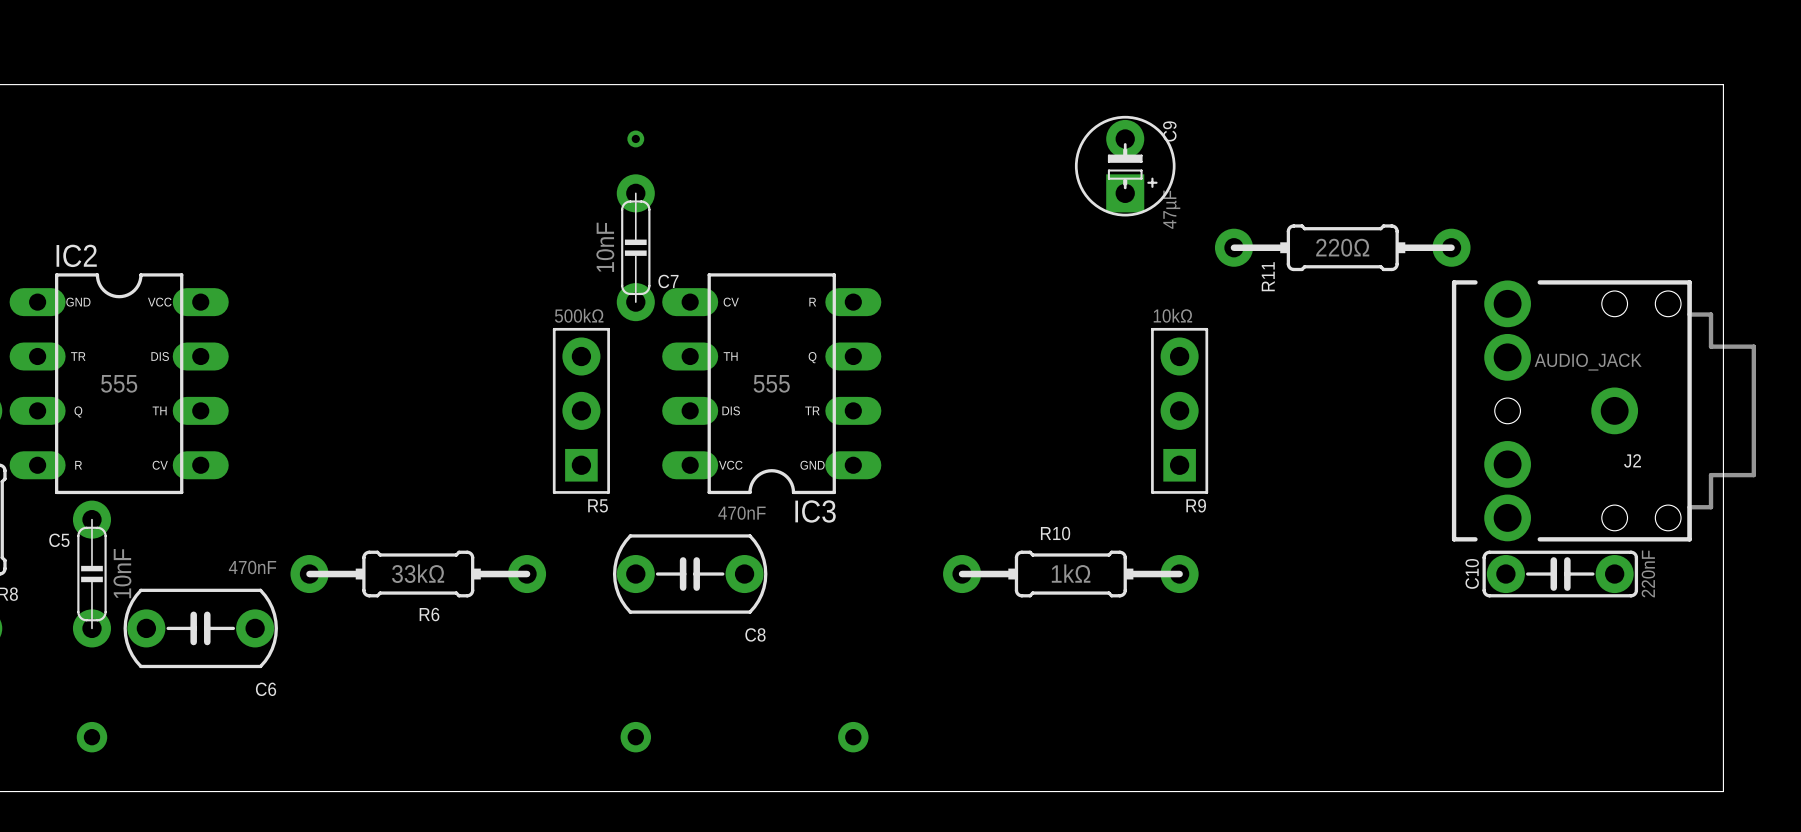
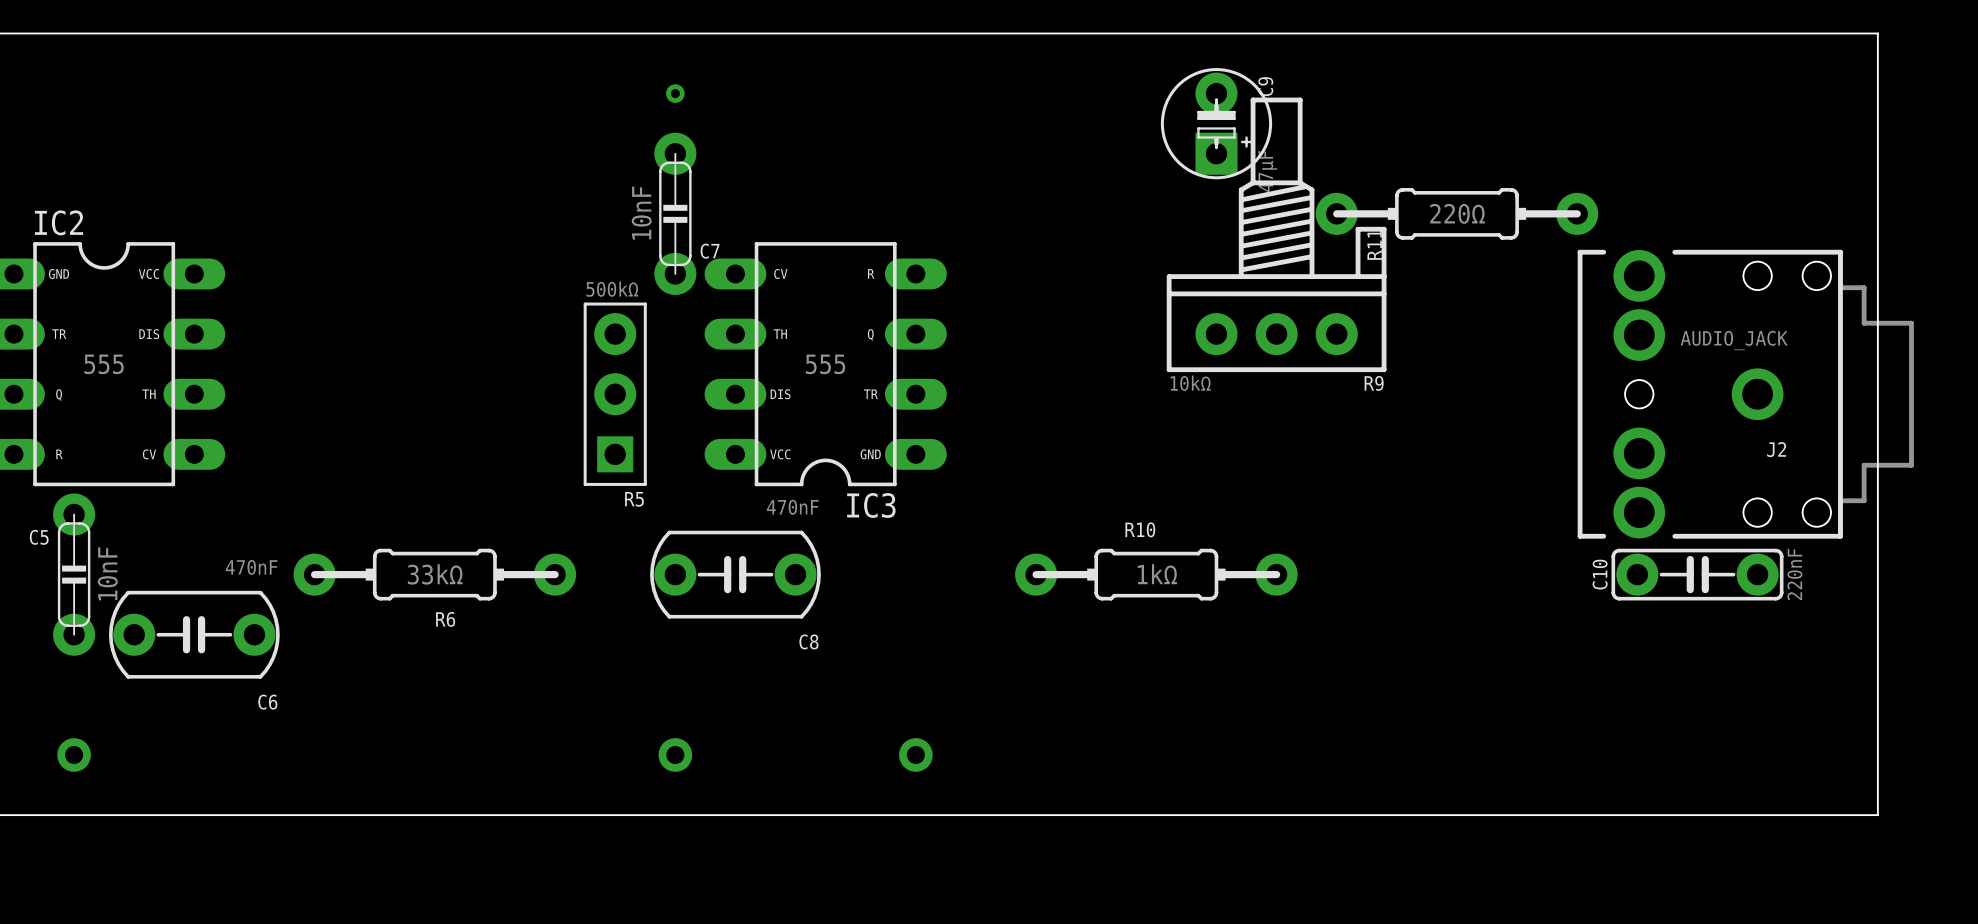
R9 value position: 10kΩ (1172, 315) -> 10kΩ (1190, 383)
R9 footprint: [1151, 327, 1209, 494] -> [1166, 97, 1387, 373]
R9 name position: R9 (1196, 505) -> R9 (1374, 383)

